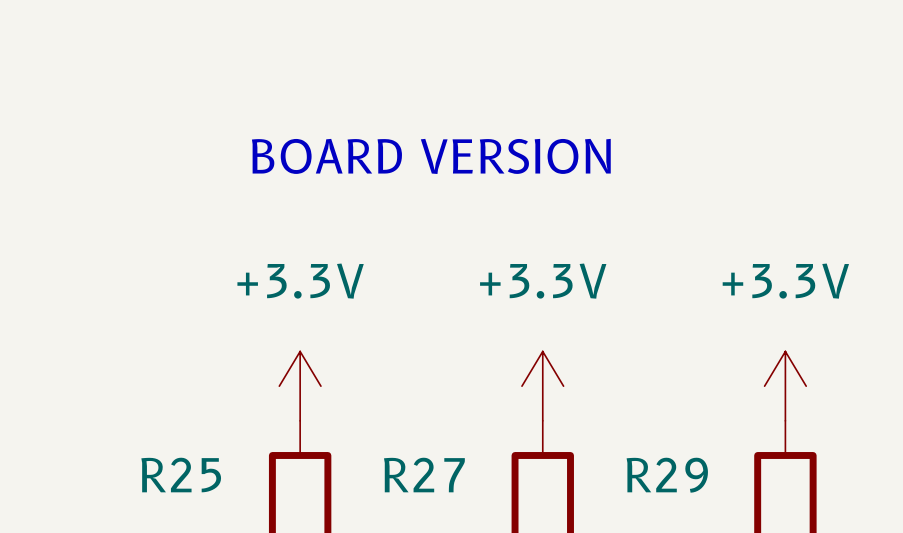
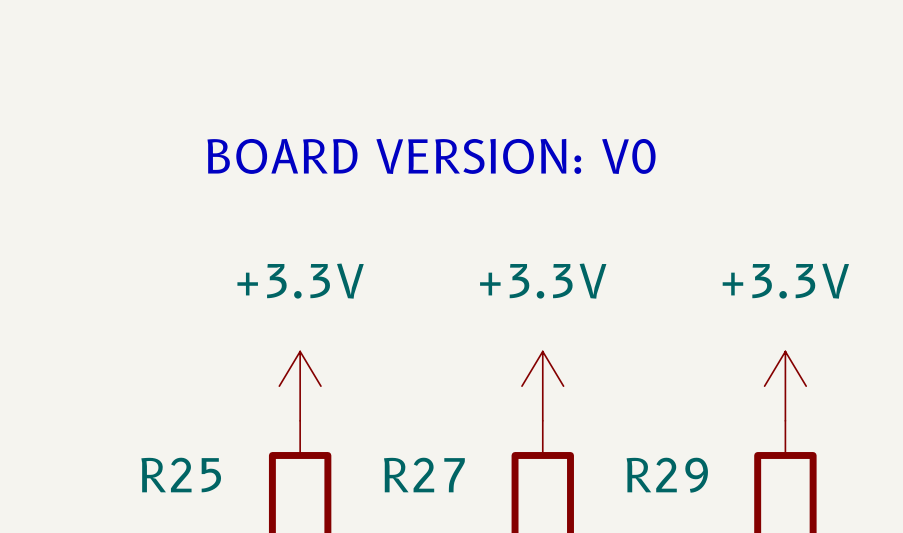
text: BOARD VERSION (431, 156) -> BOARD VERSION: V0 (431, 156)

